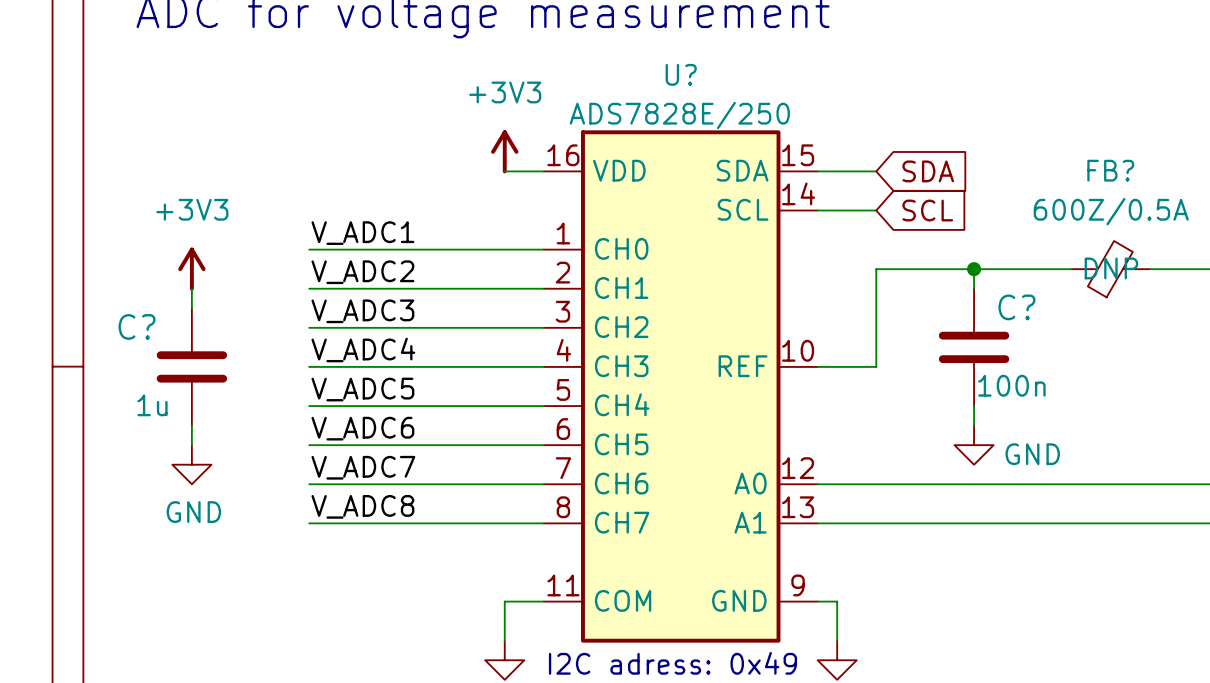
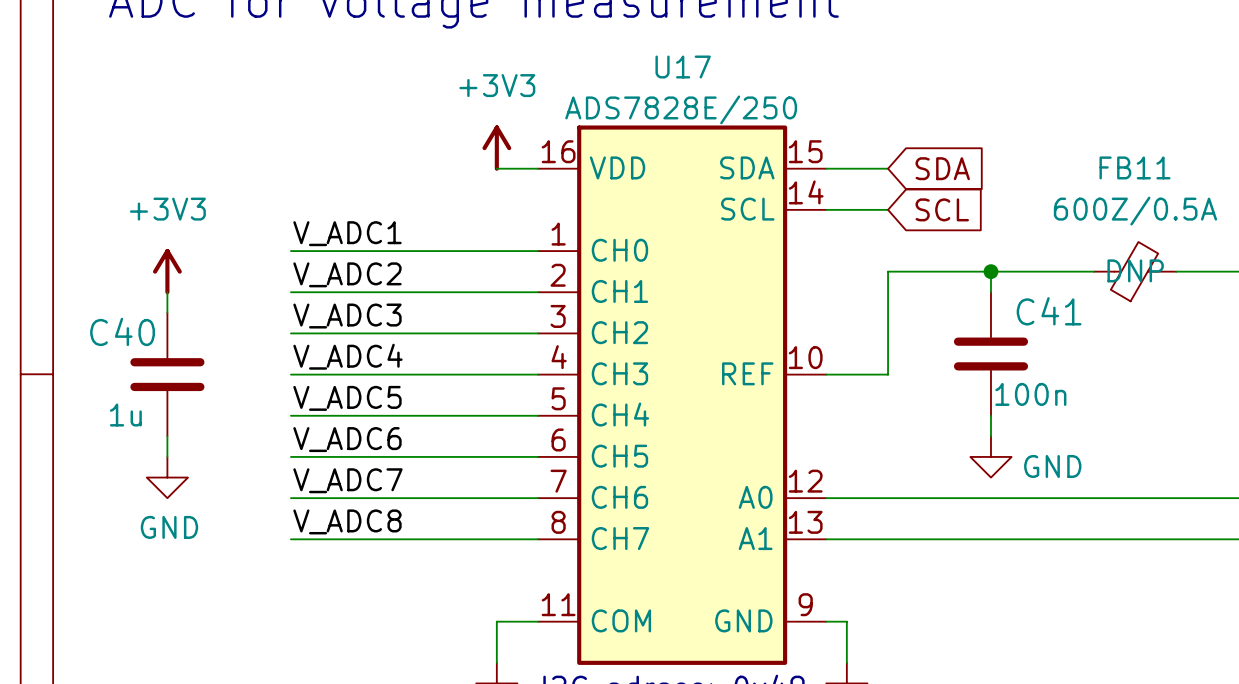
U? name: U? (681, 74) -> U17 (683, 67)
FB? name: FB? (1110, 170) -> FB11 (1134, 167)
C? name: C? (1016, 307) -> C41 (1049, 311)
C? name: C? (137, 326) -> C40 (122, 331)

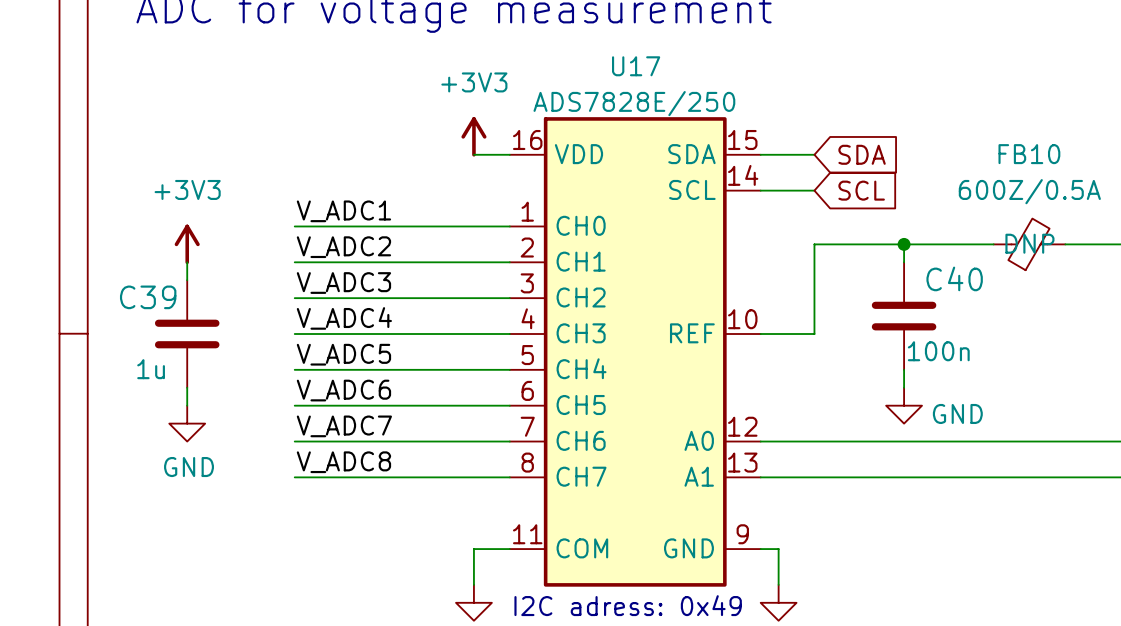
FB11 name: FB11 (1134, 167) -> FB10 (1029, 154)
C41 name: C41 (1049, 311) -> C40 (954, 278)
C40 name: C40 (122, 331) -> C39 (148, 297)

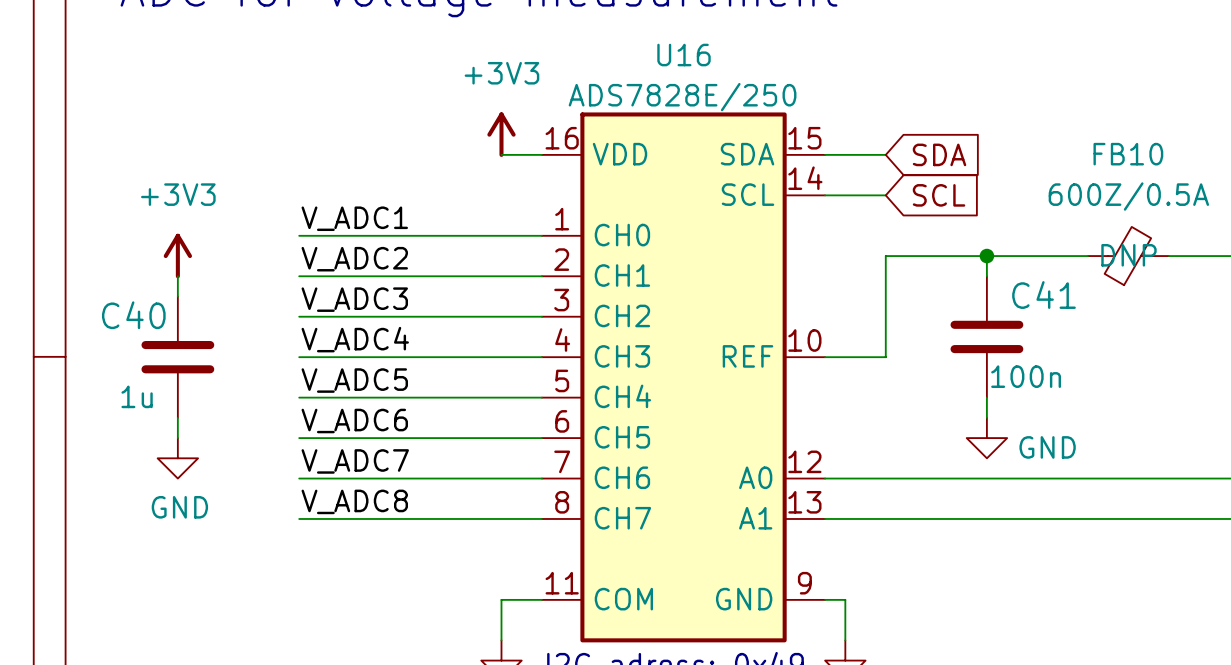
U17 name: U17 (636, 66) -> U16 (684, 55)
C40 name: C40 (954, 278) -> C41 (1044, 295)
C39 name: C39 (148, 297) -> C40 (133, 315)

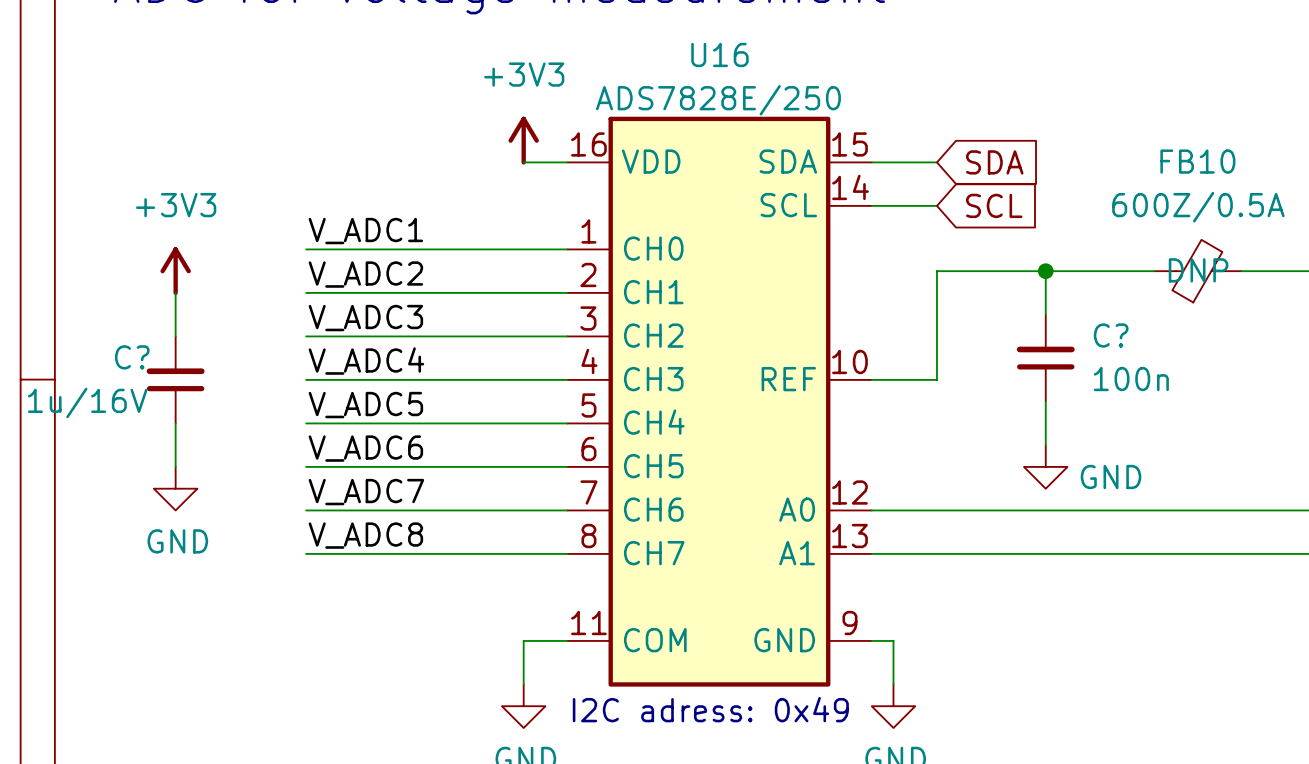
C41: (986, 336) -> none
C?: none -> (1045, 358)
C40: (177, 357) -> none
C?: none -> (175, 379)

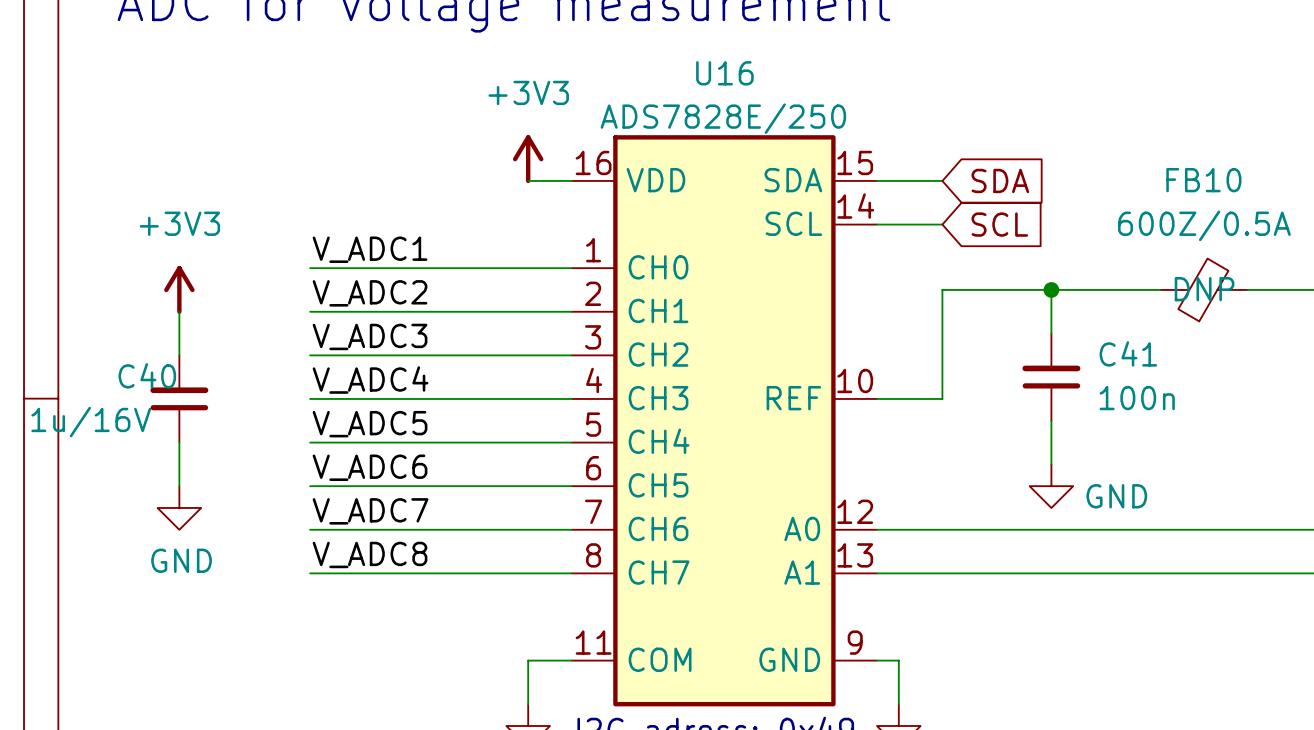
C? name: C? (1111, 335) -> C41 (1128, 353)
C? name: C? (132, 357) -> C40 (147, 375)

